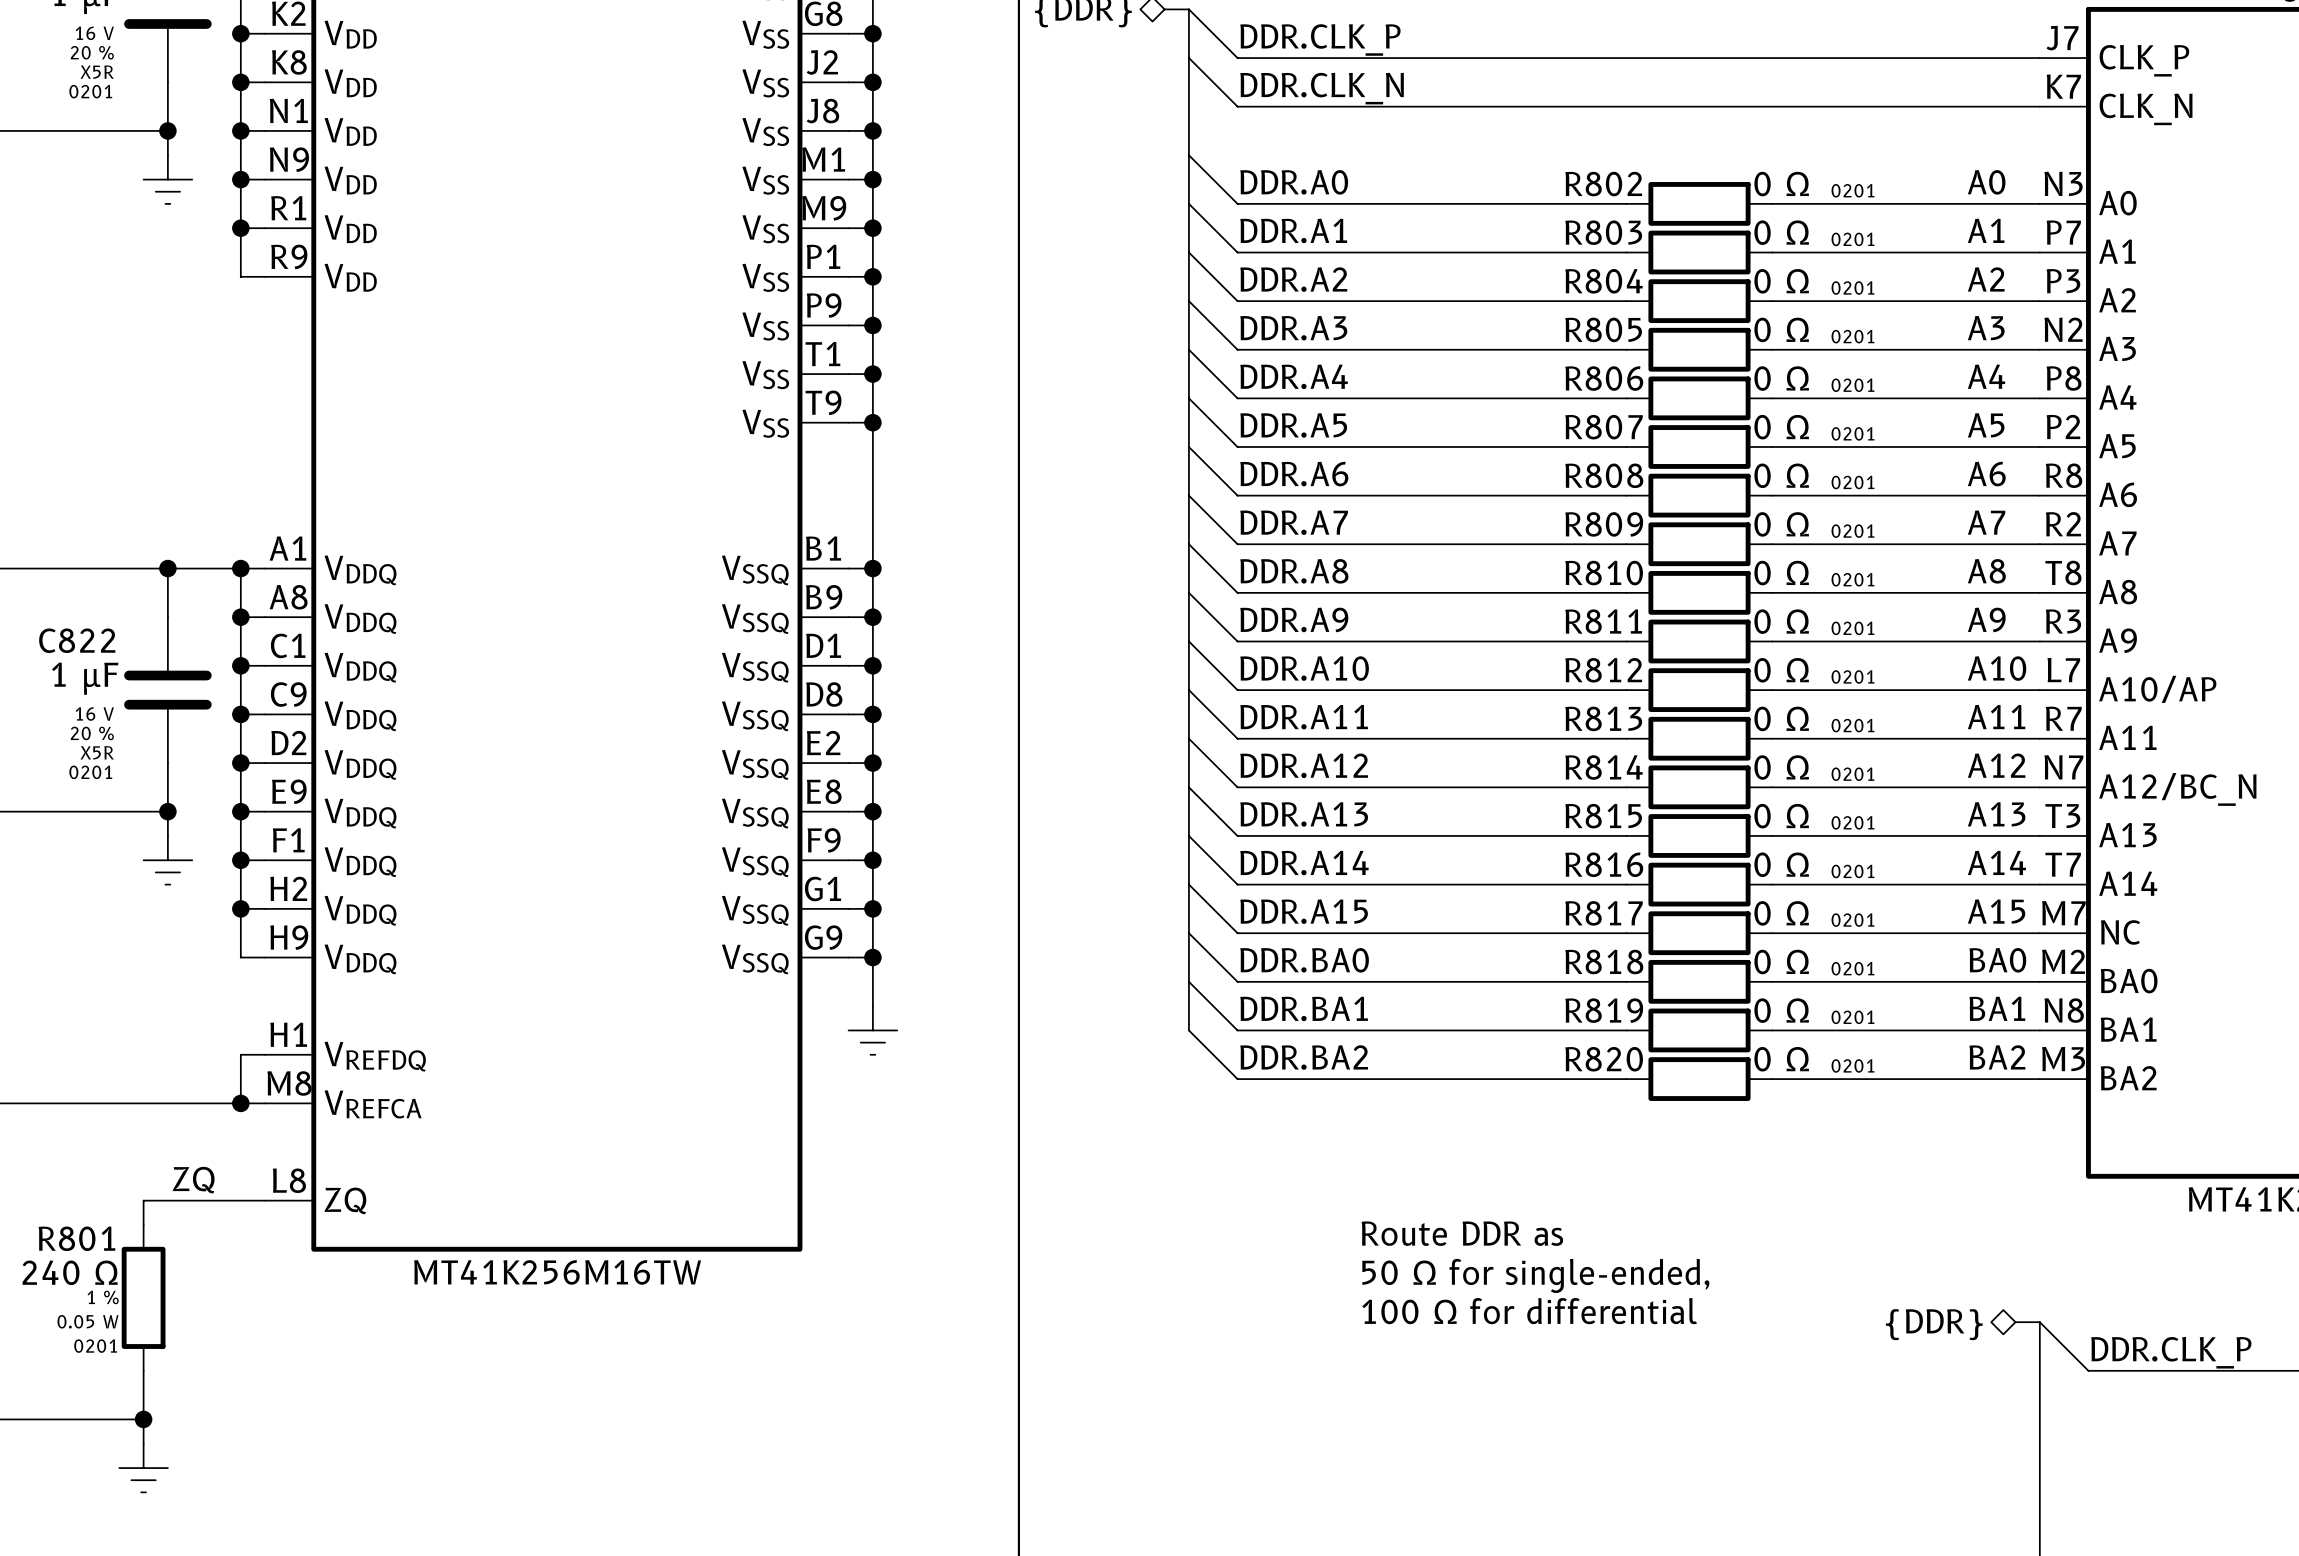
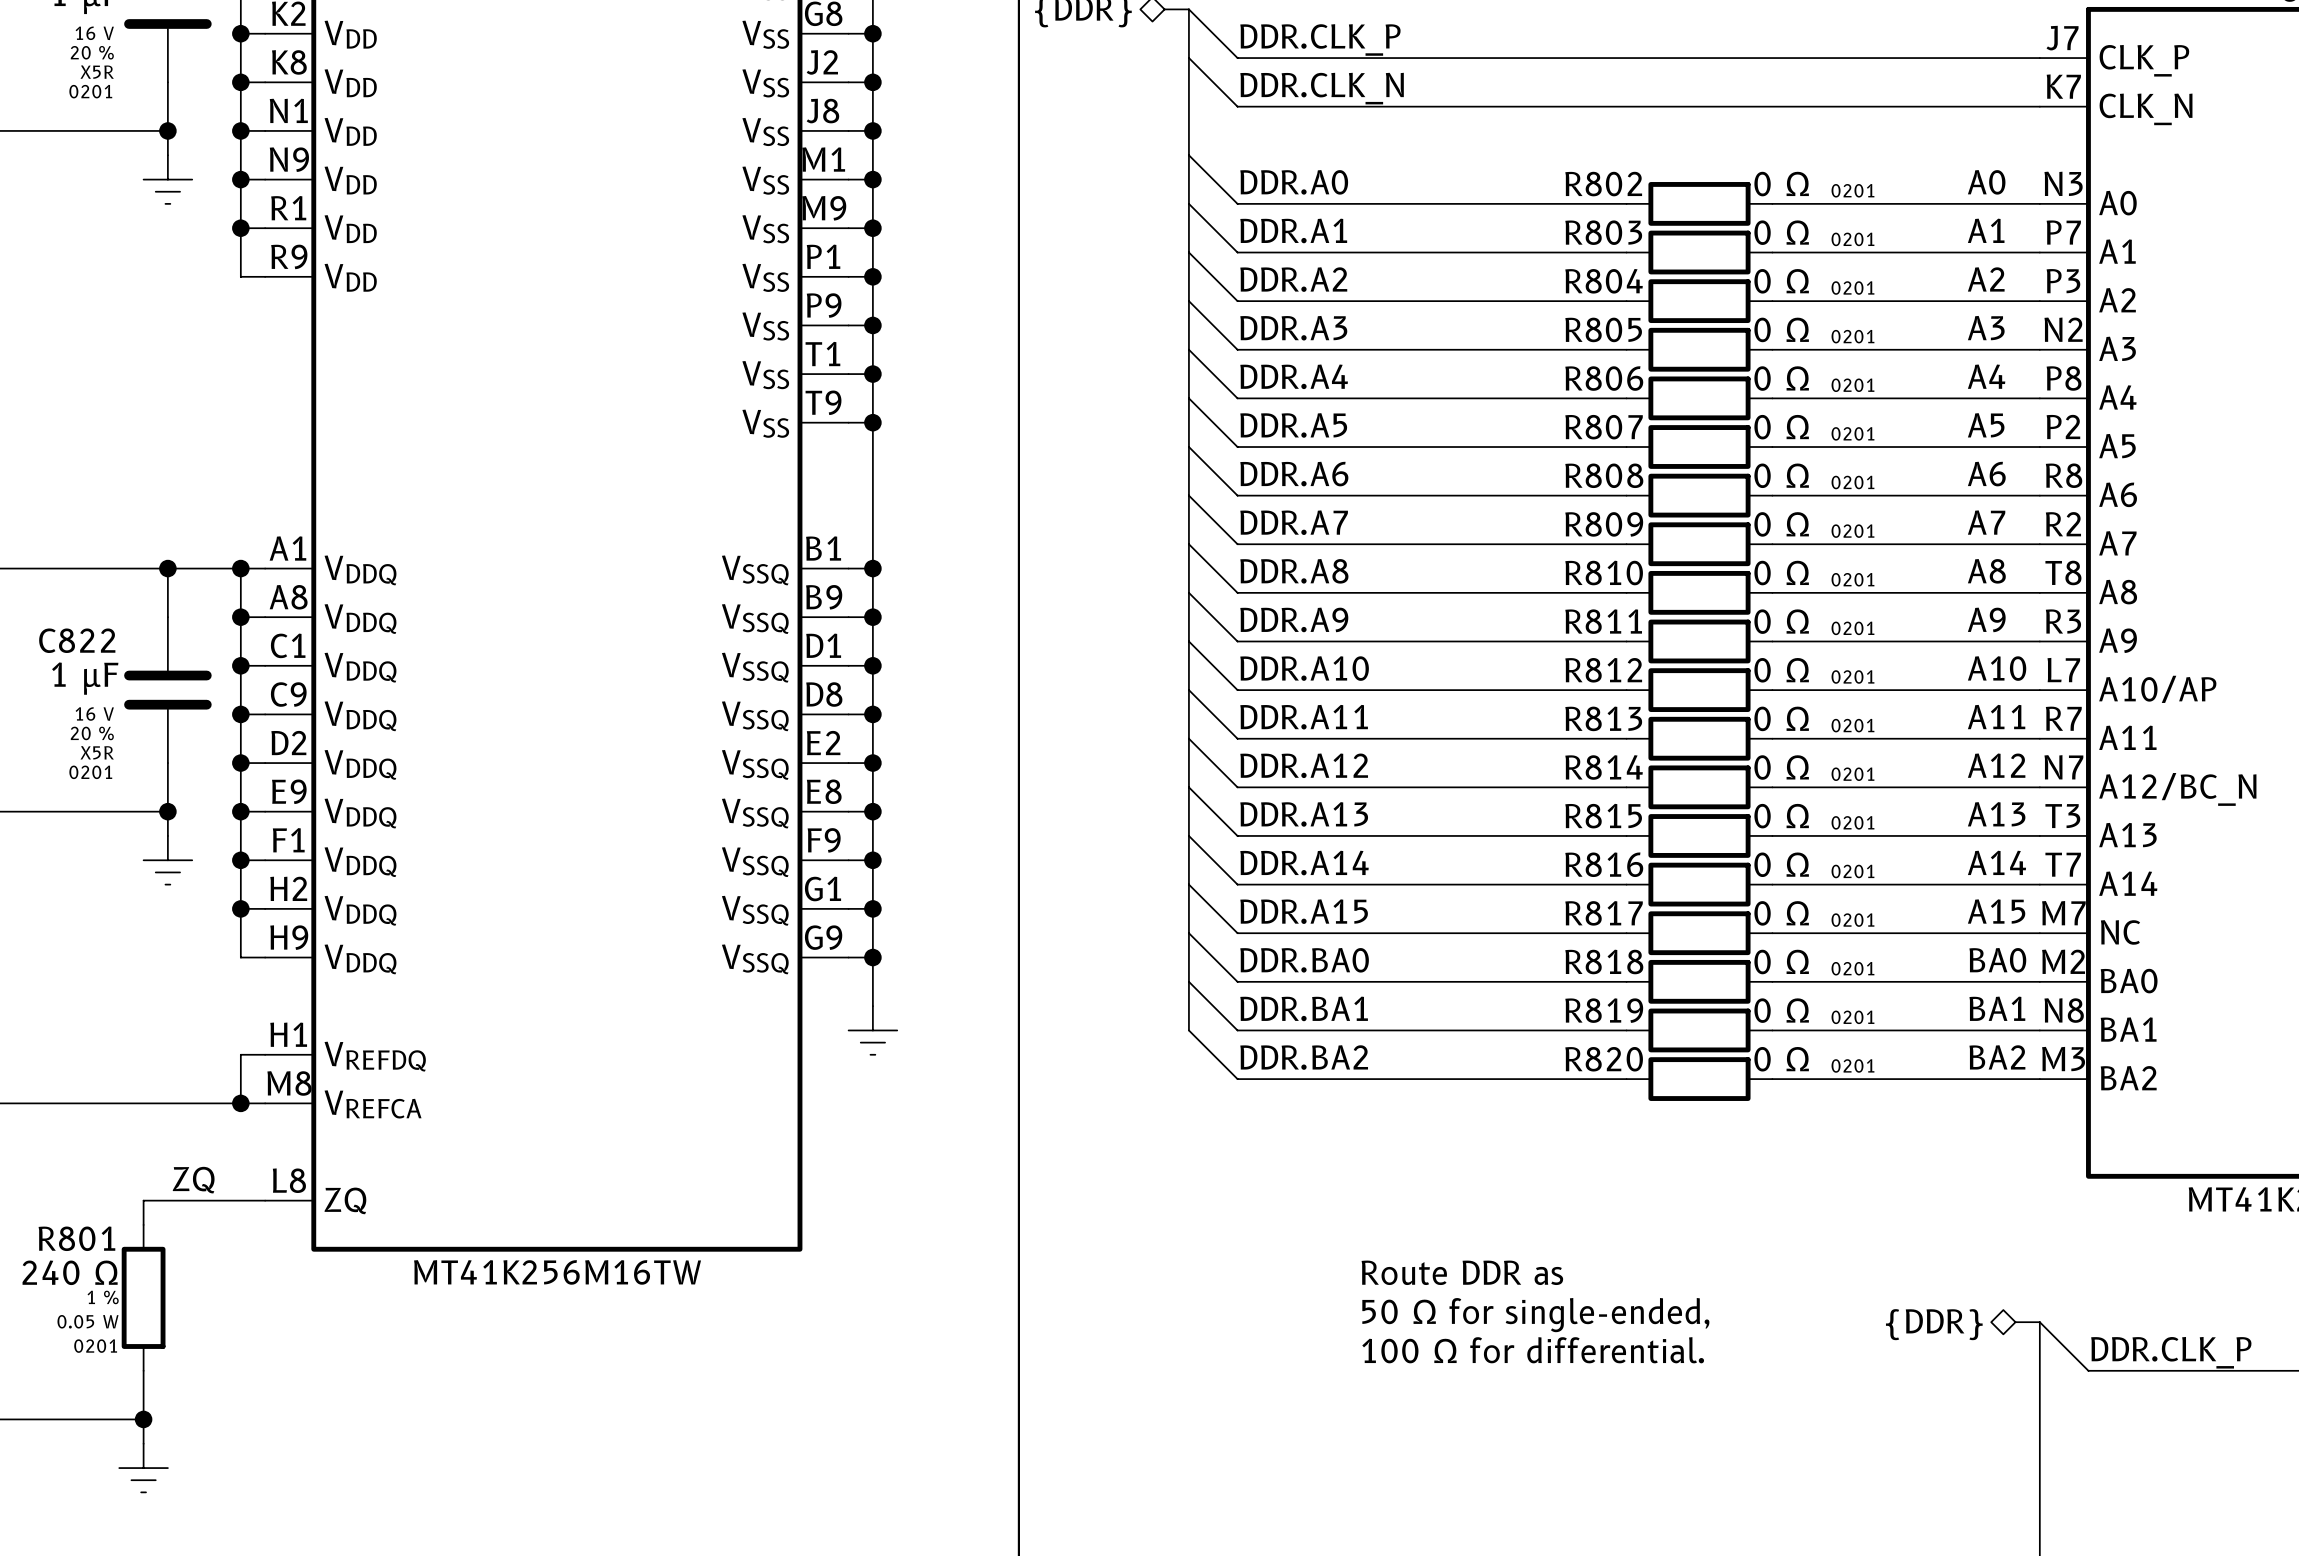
text position: Route DDR as (1462, 1233) -> Route DDR as (1462, 1272)
text position: 50 Ω for single-ended, (1535, 1275) -> 50 Ω for single-ended, (1535, 1315)
text: 100 Ω for differential (1529, 1311) -> 100 Ω for differential. (1533, 1350)

